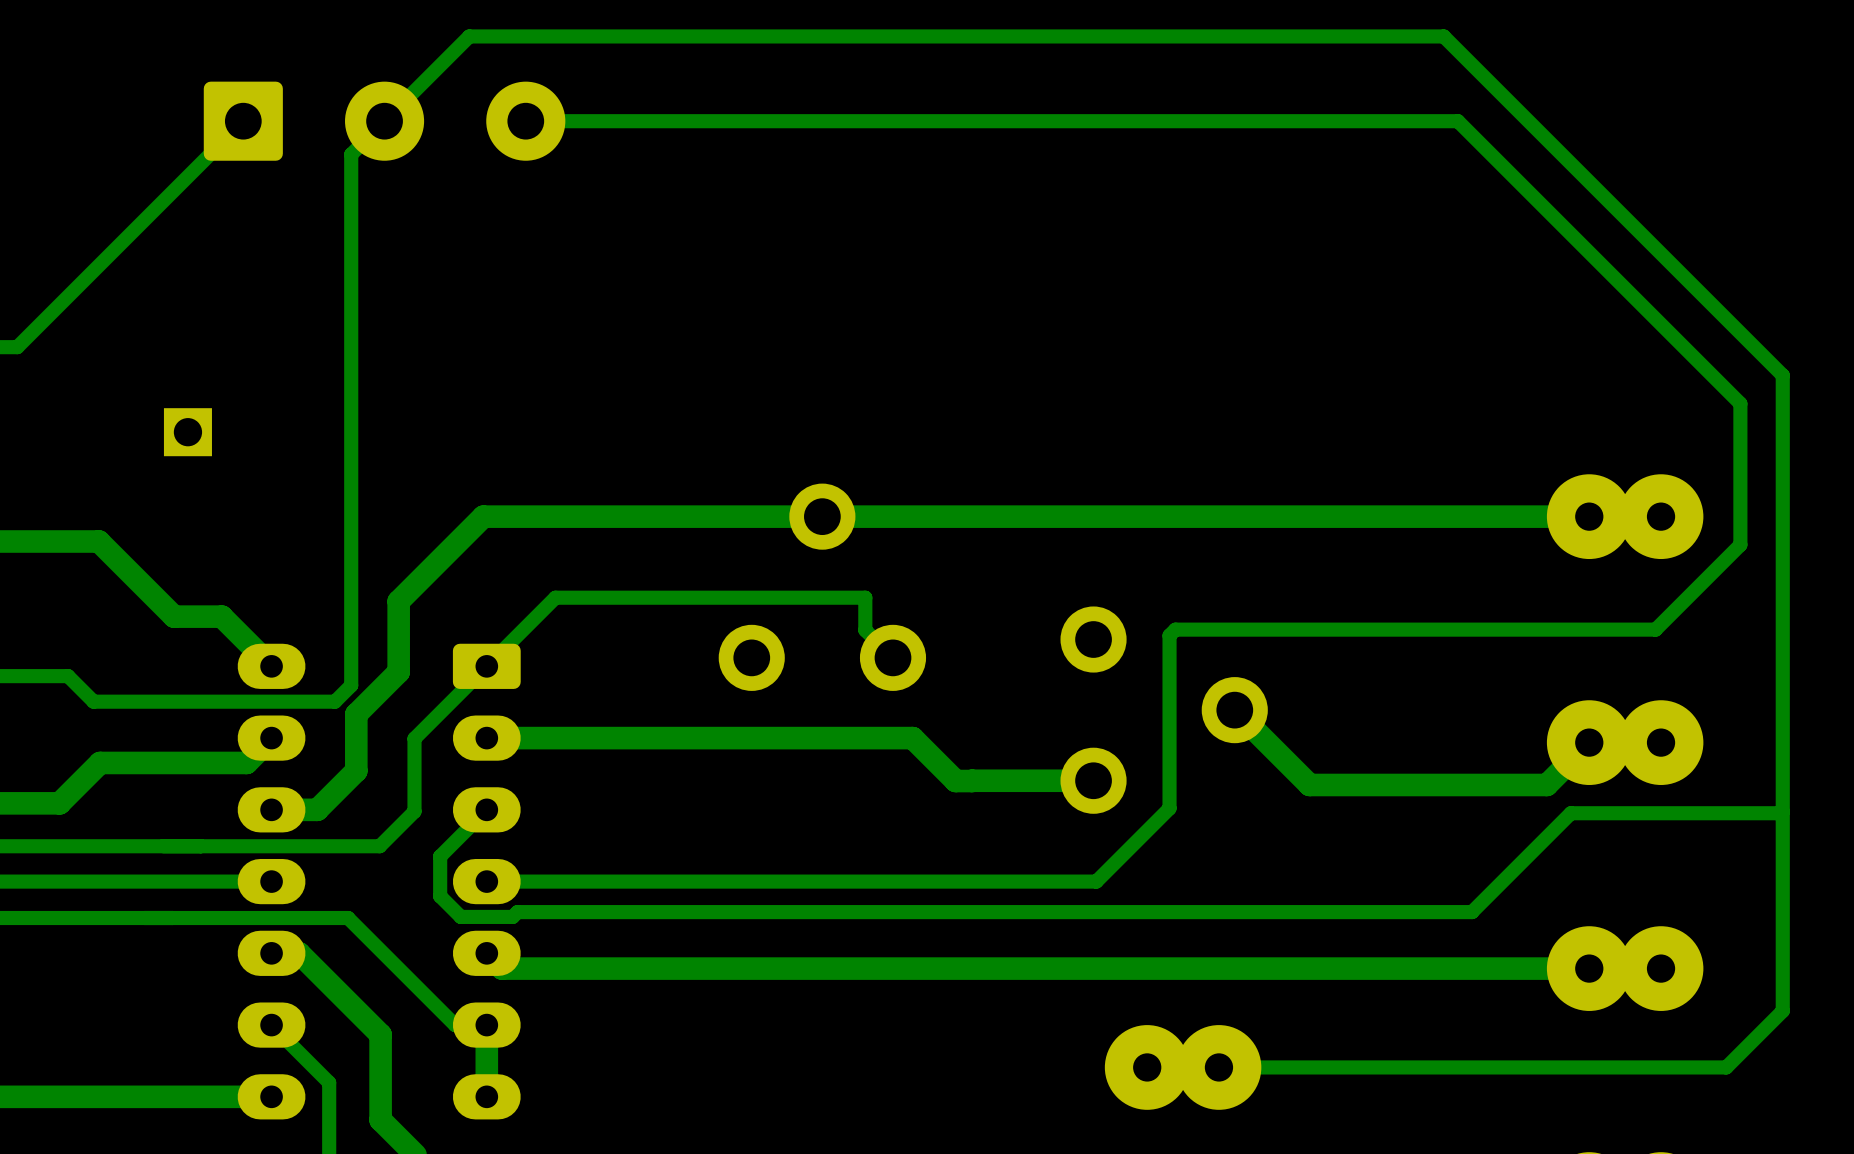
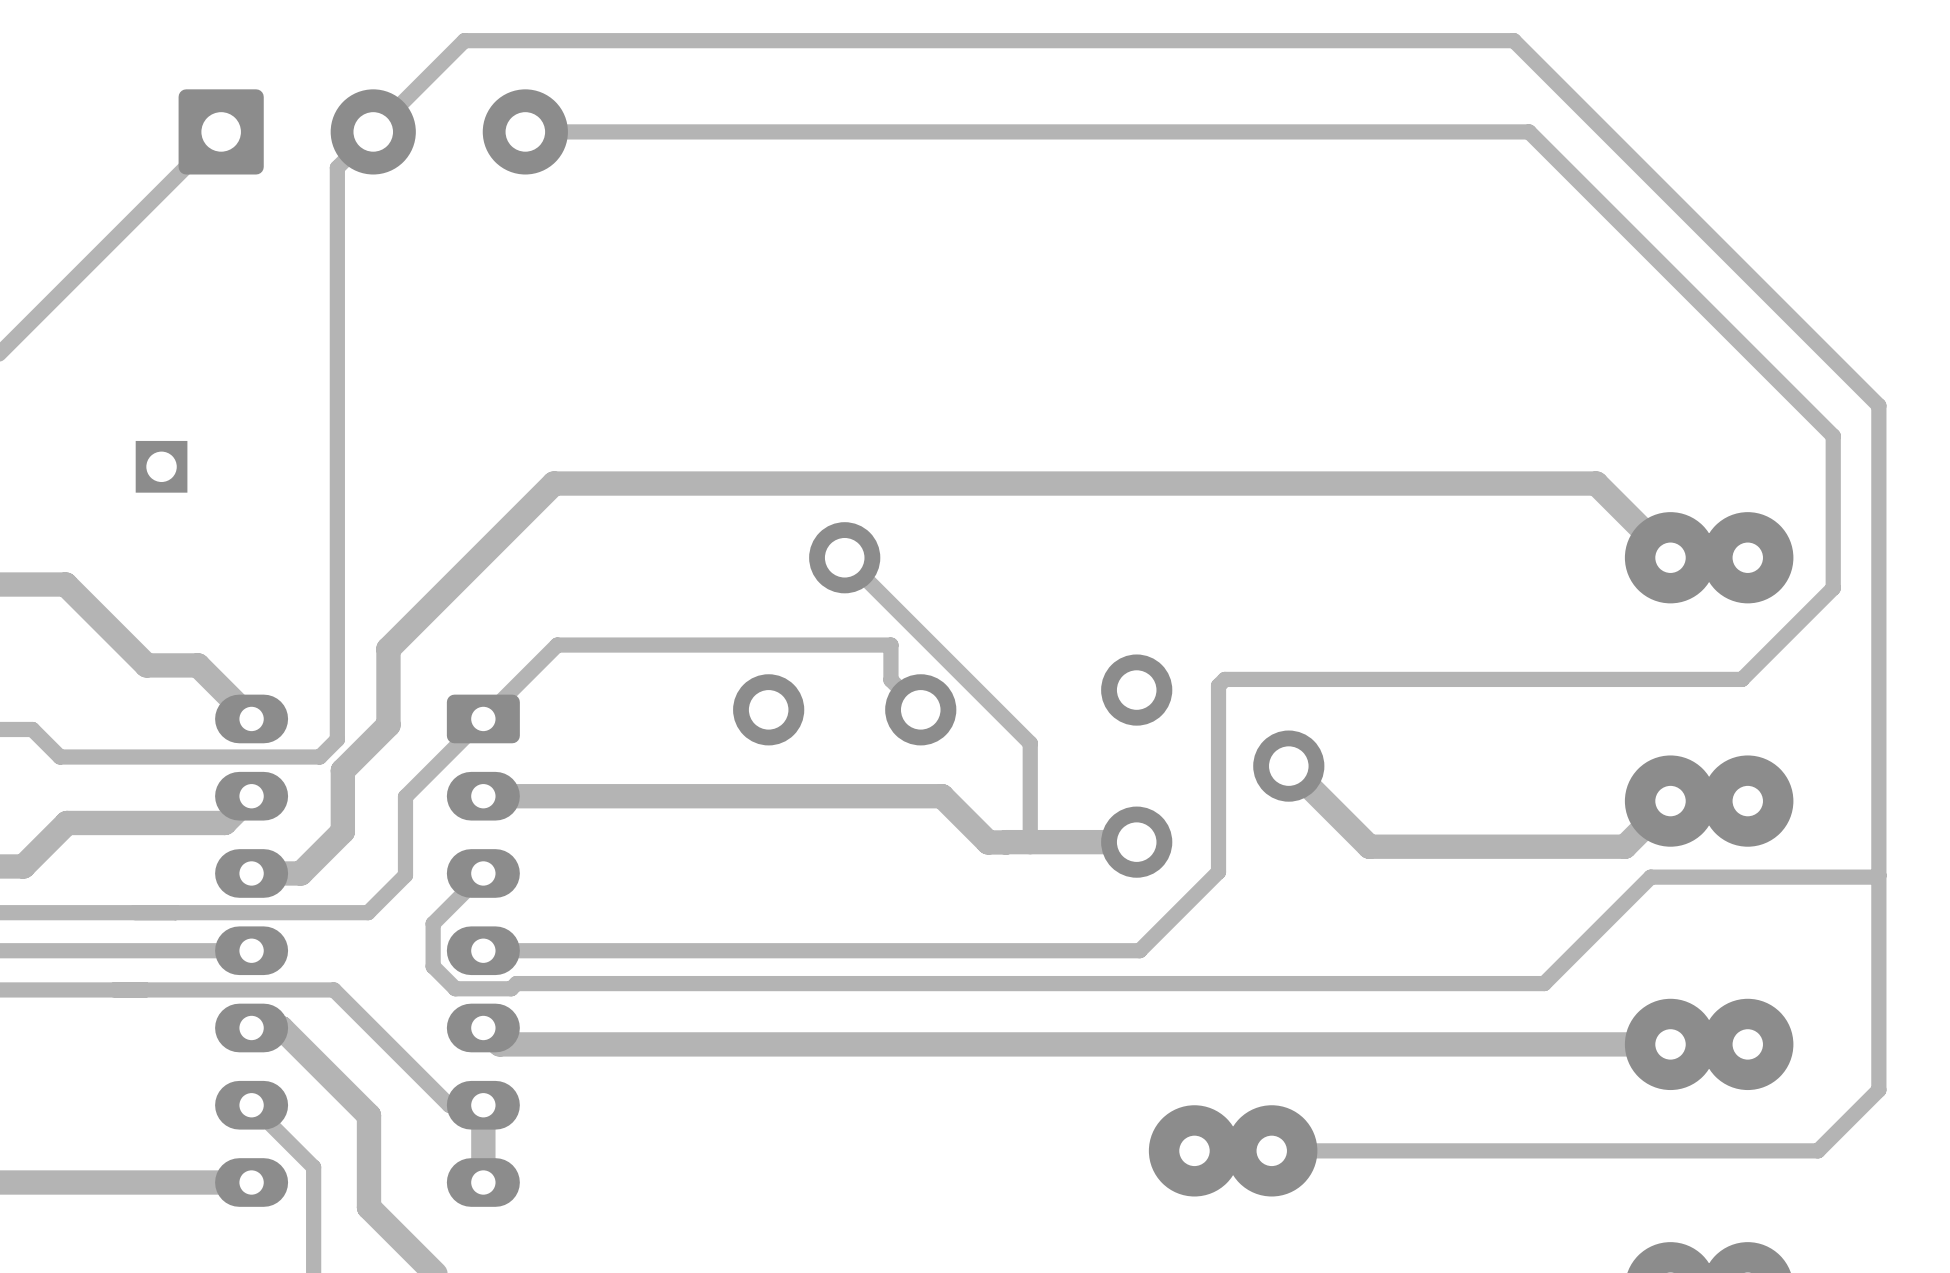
track: none -> (844, 557) (1030, 743) (1030, 842)
track: (1589, 516) (483, 516) -> (1670, 557) (1596, 483) (553, 483) (479, 557)

